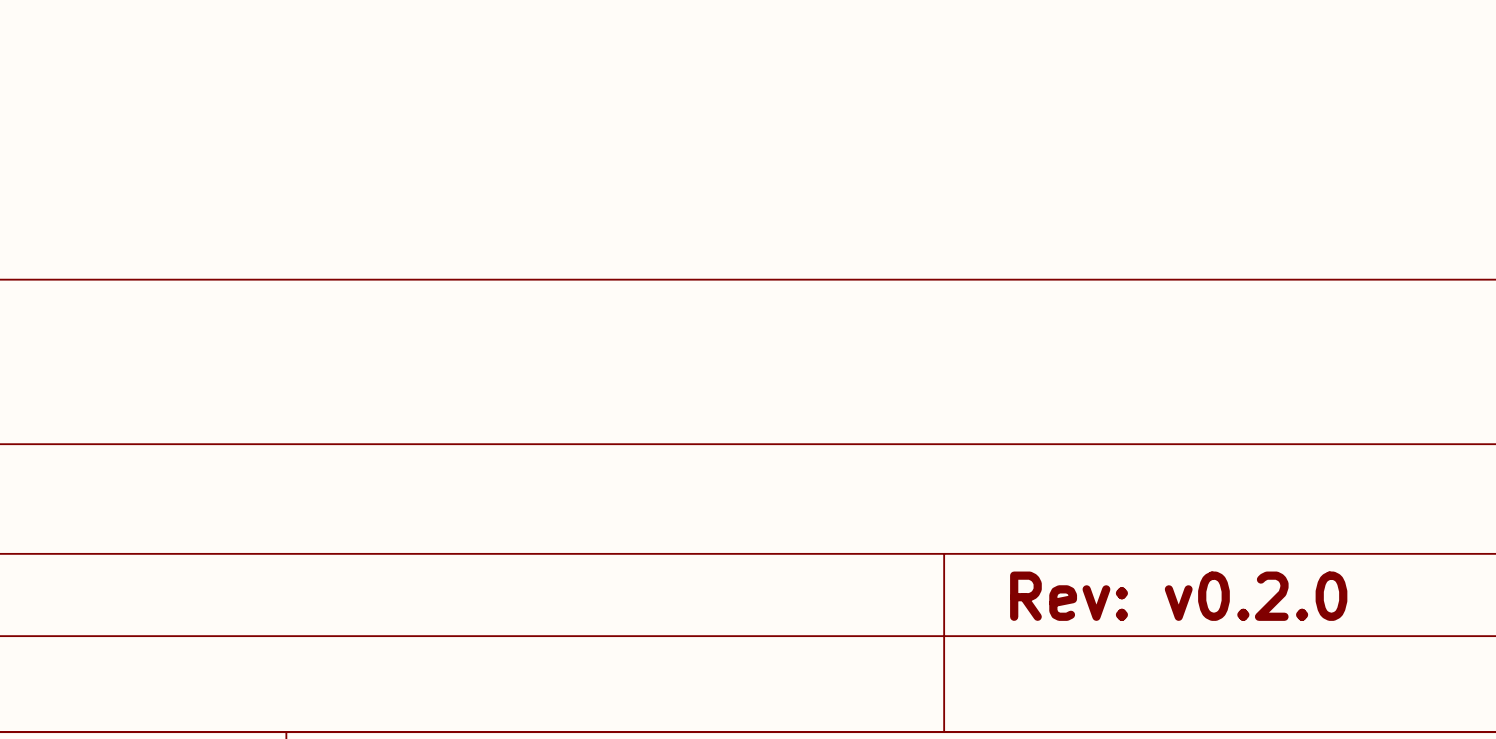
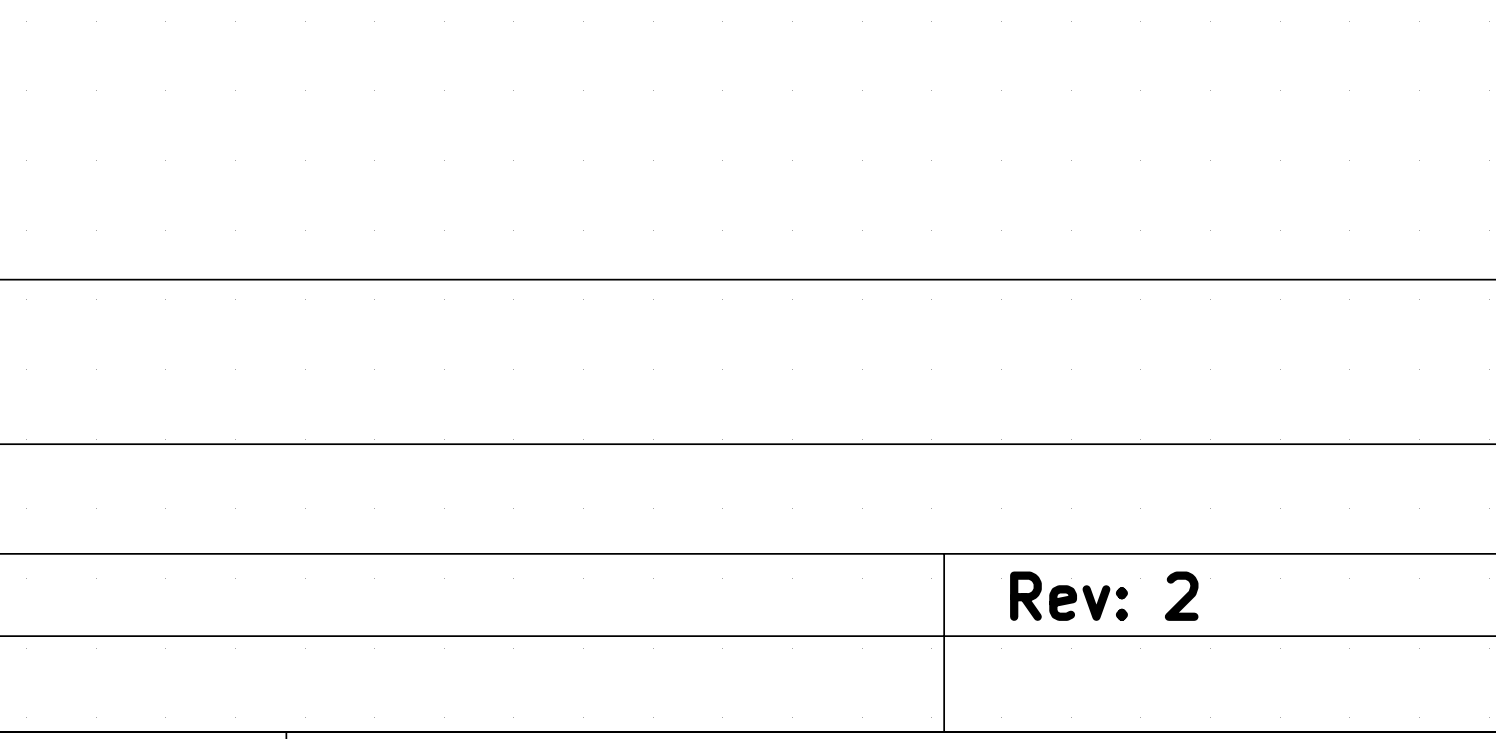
title block: Rev: v0.2.0 (1178, 596) -> Rev: 2 (1104, 596)

